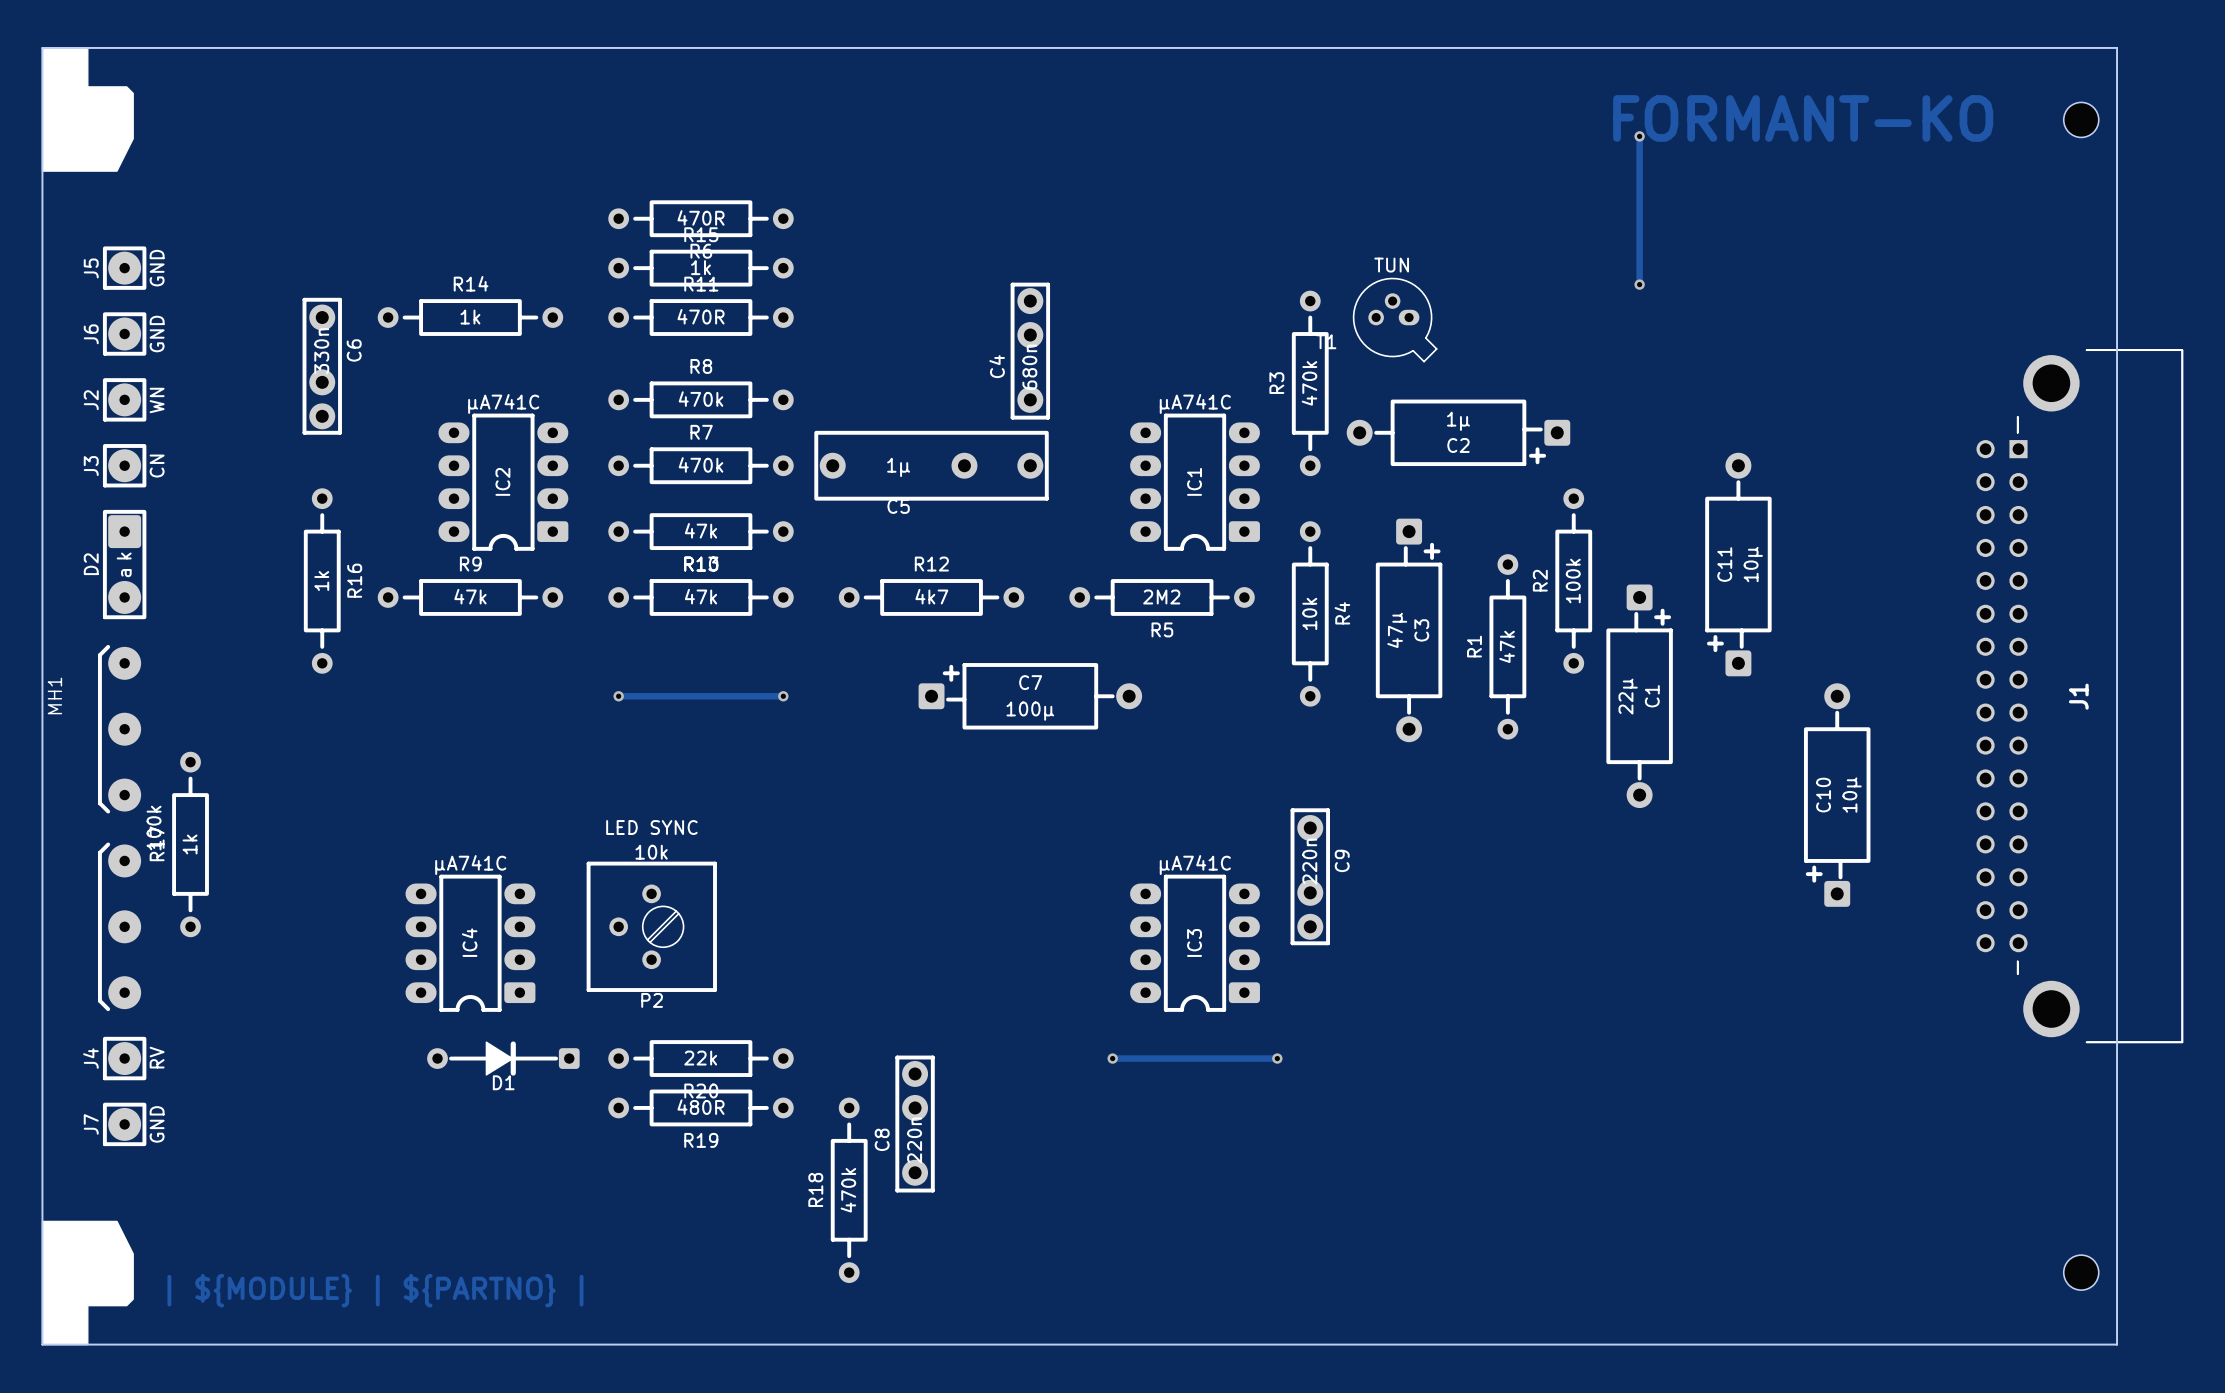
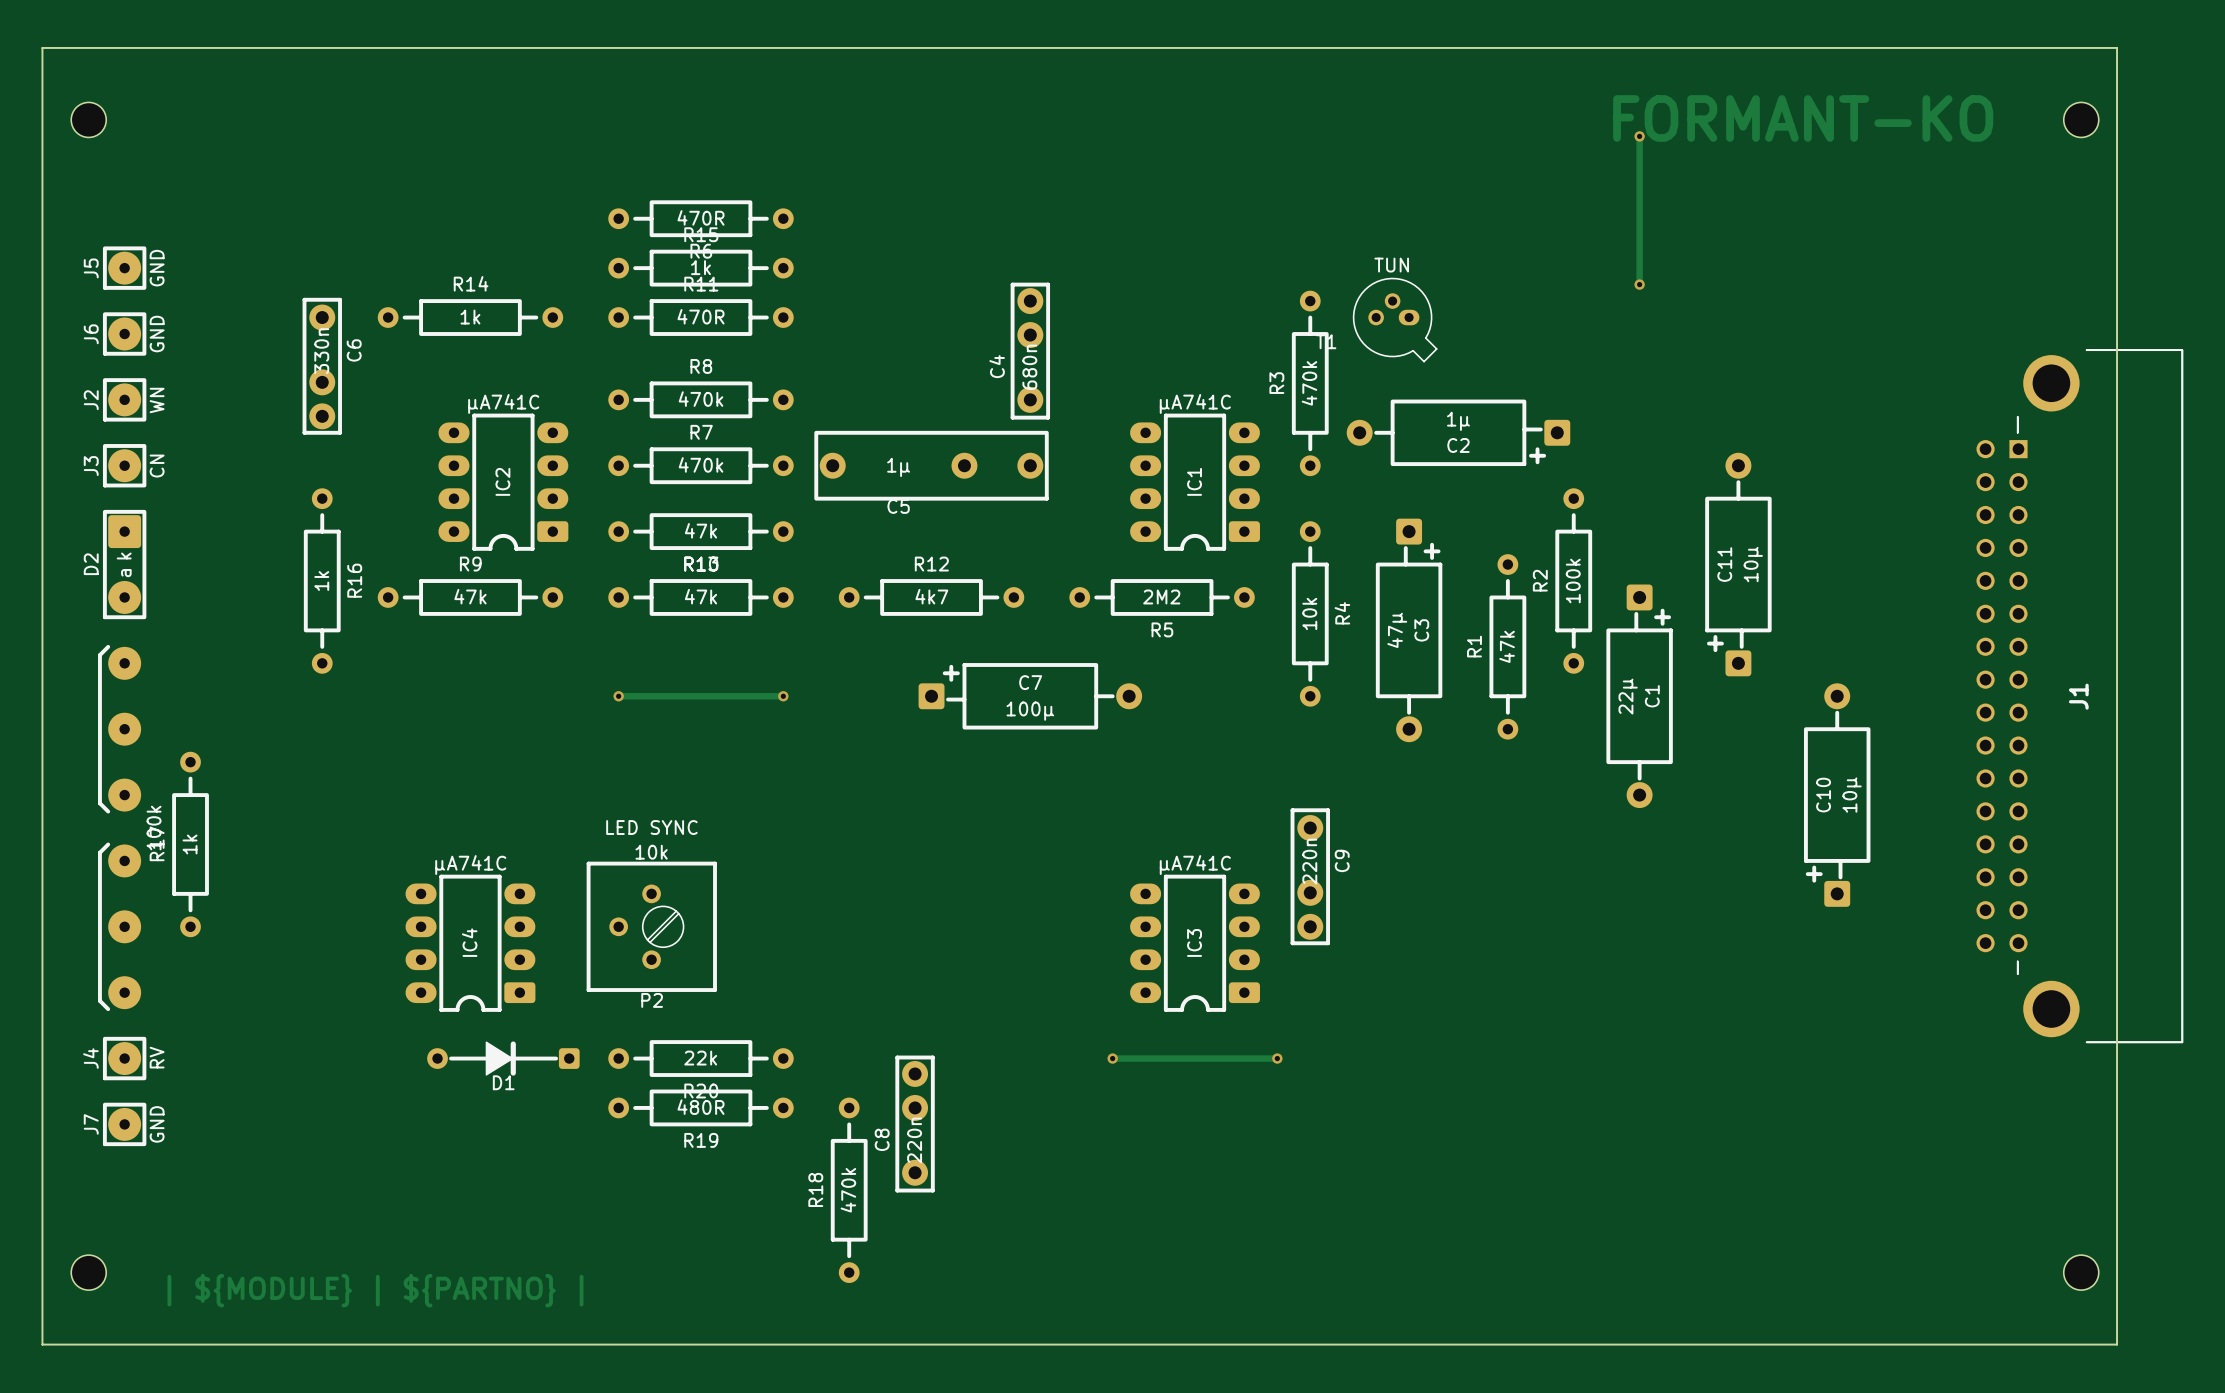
part: none -> (88, 119)
MH1: (87, 696) -> none
part: none -> (88, 1272)

